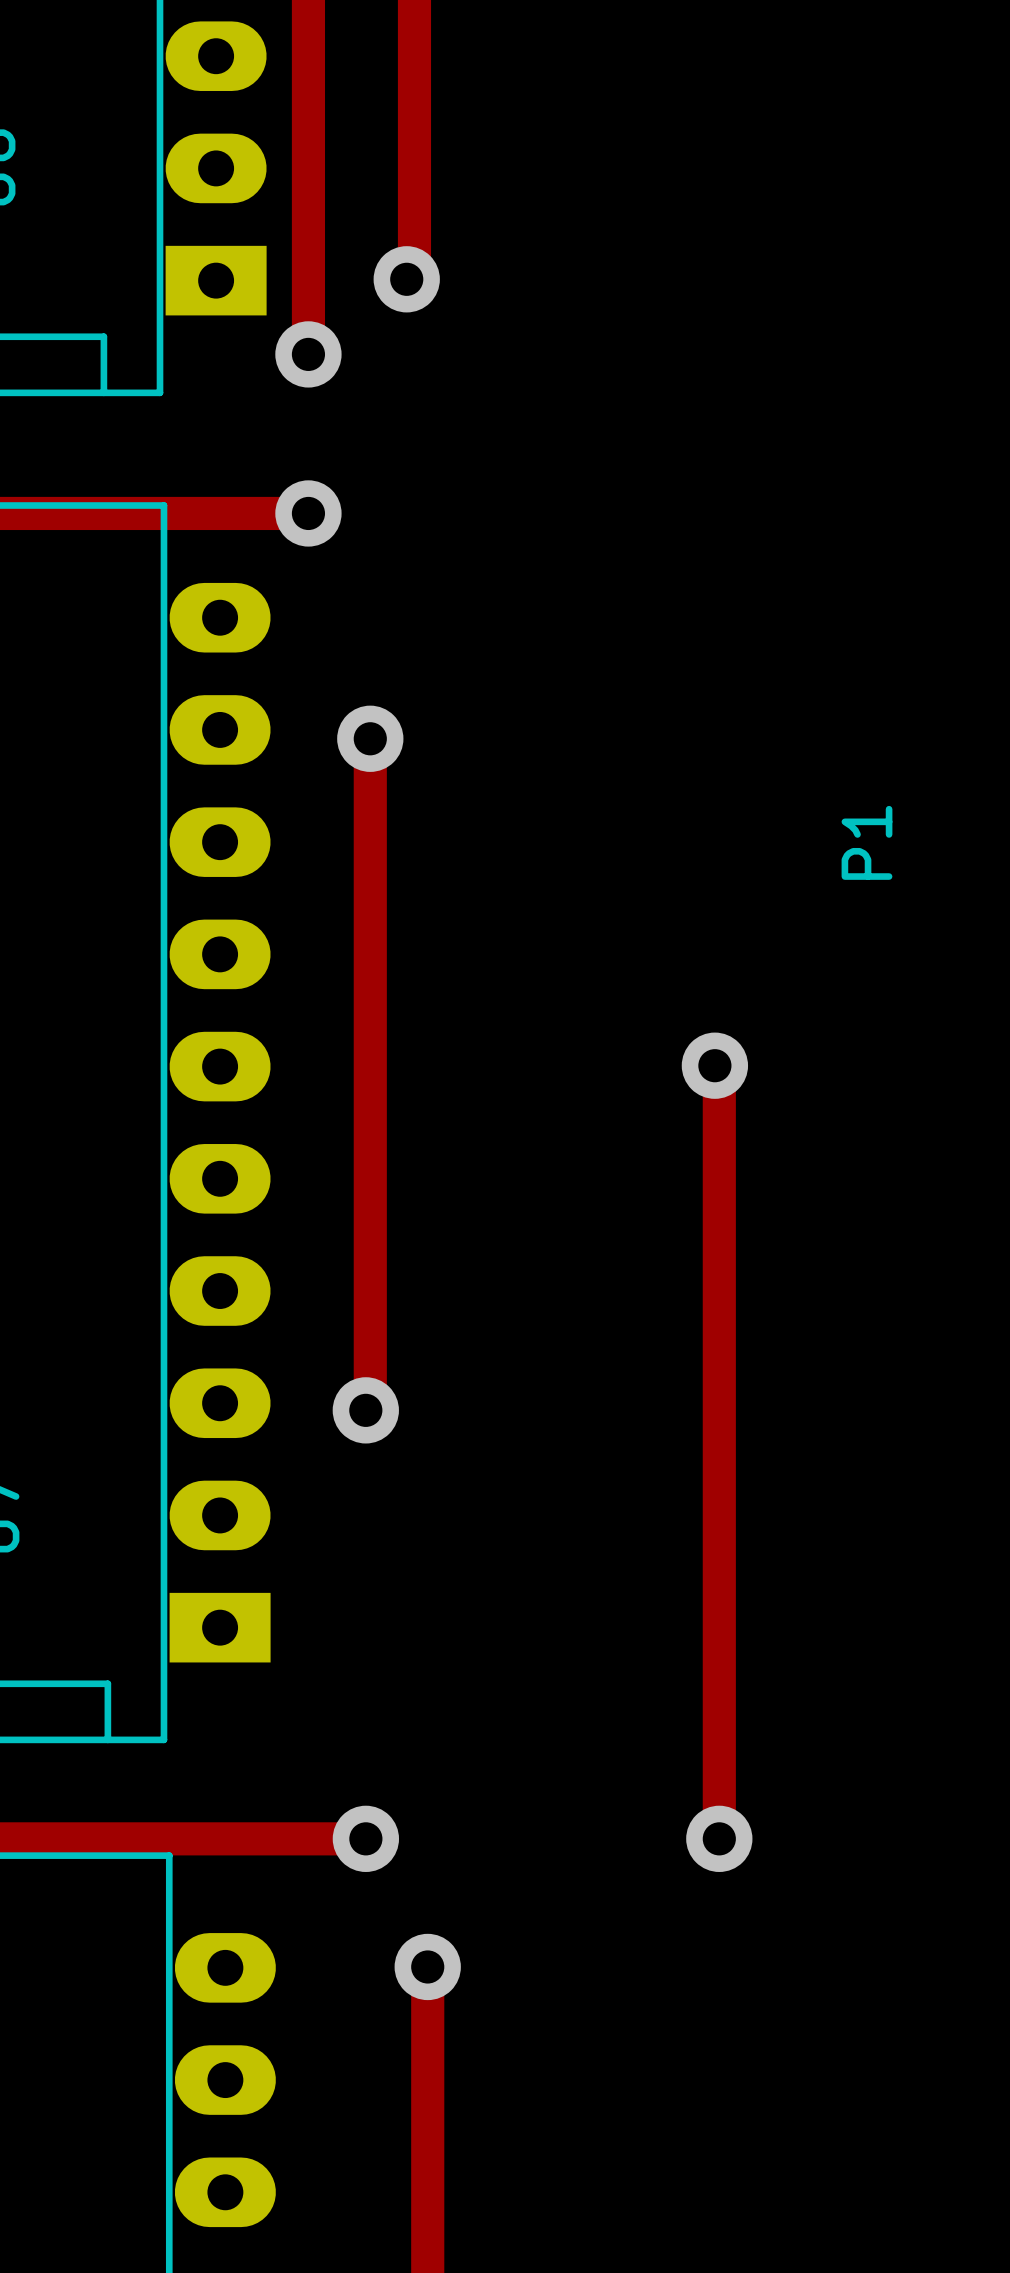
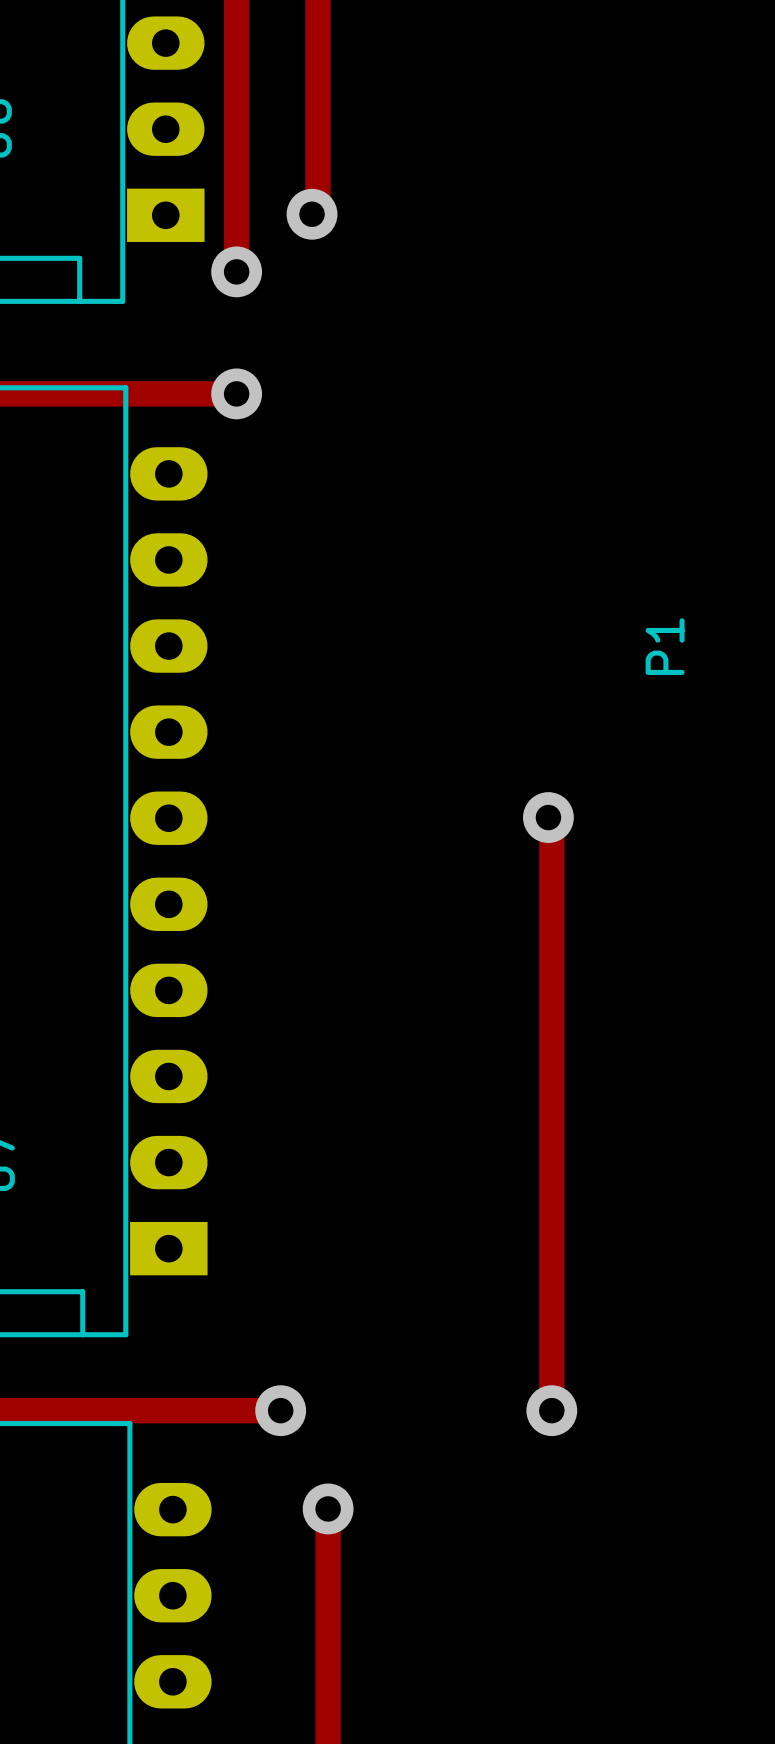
track: (370, 738) (370, 1405) (365, 1410) -> none
via: (370, 738) -> none
via: (365, 1410) -> none

